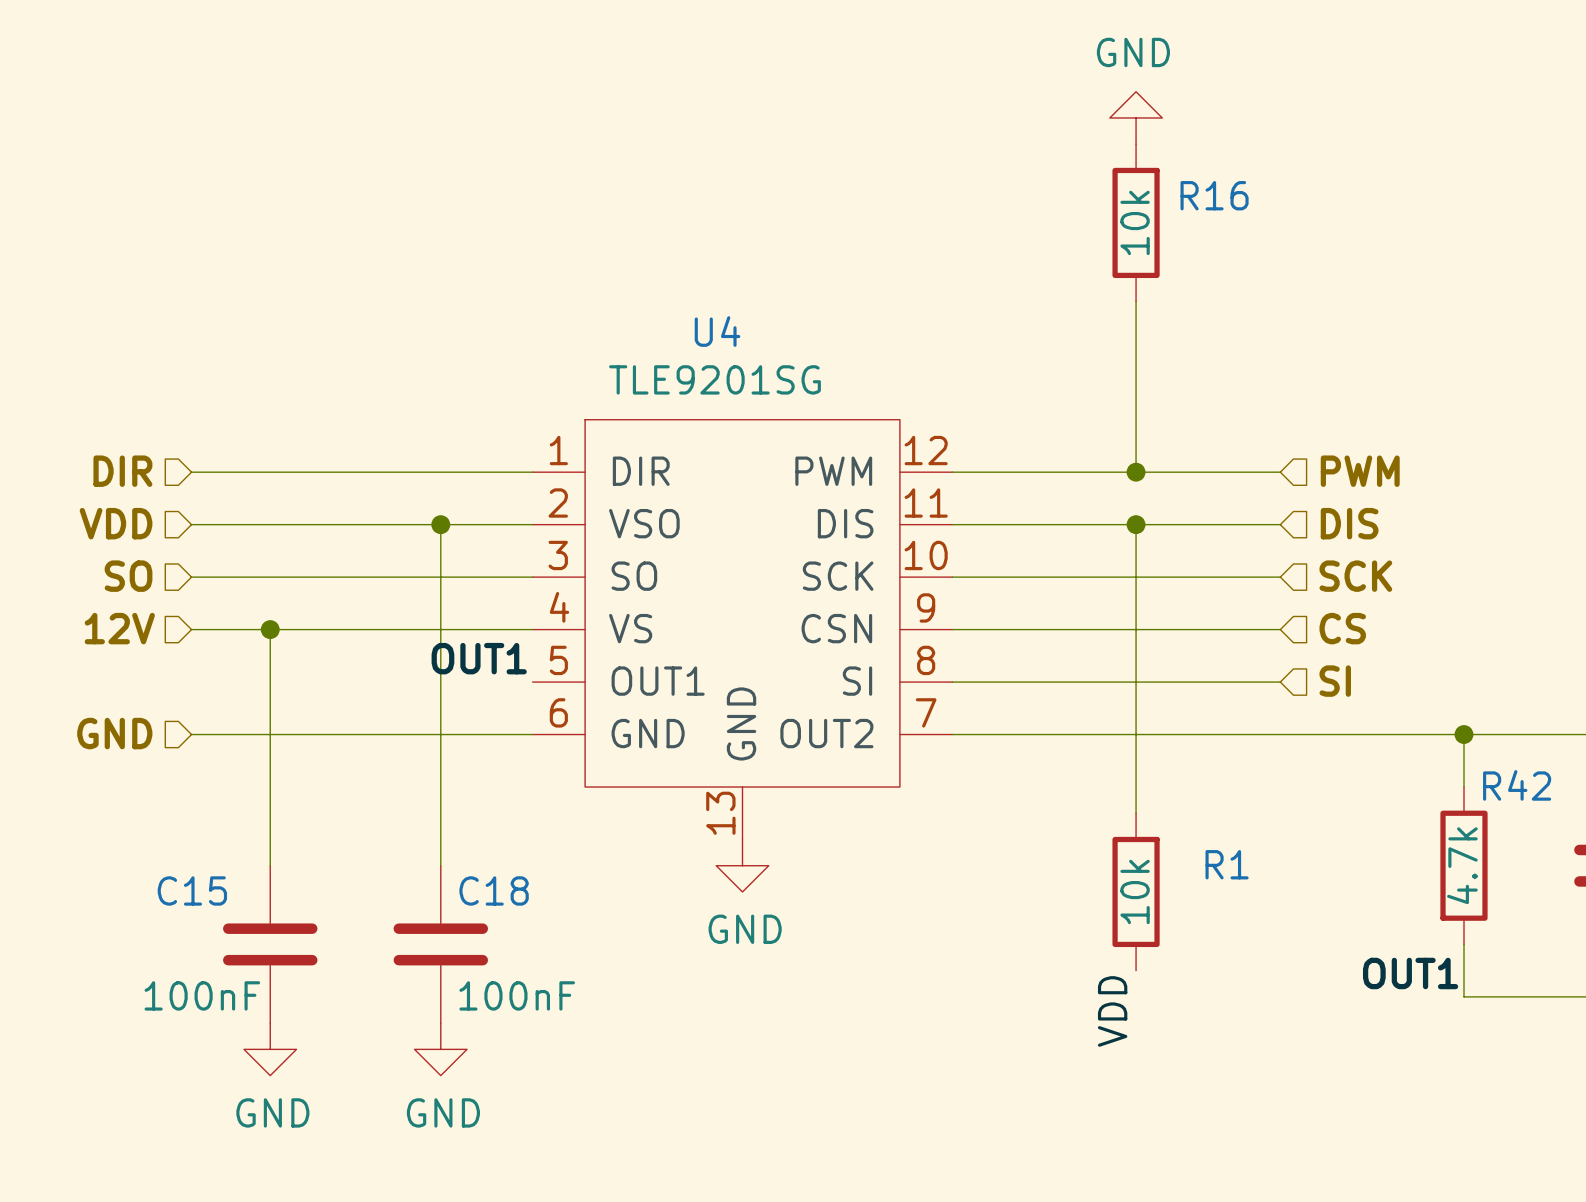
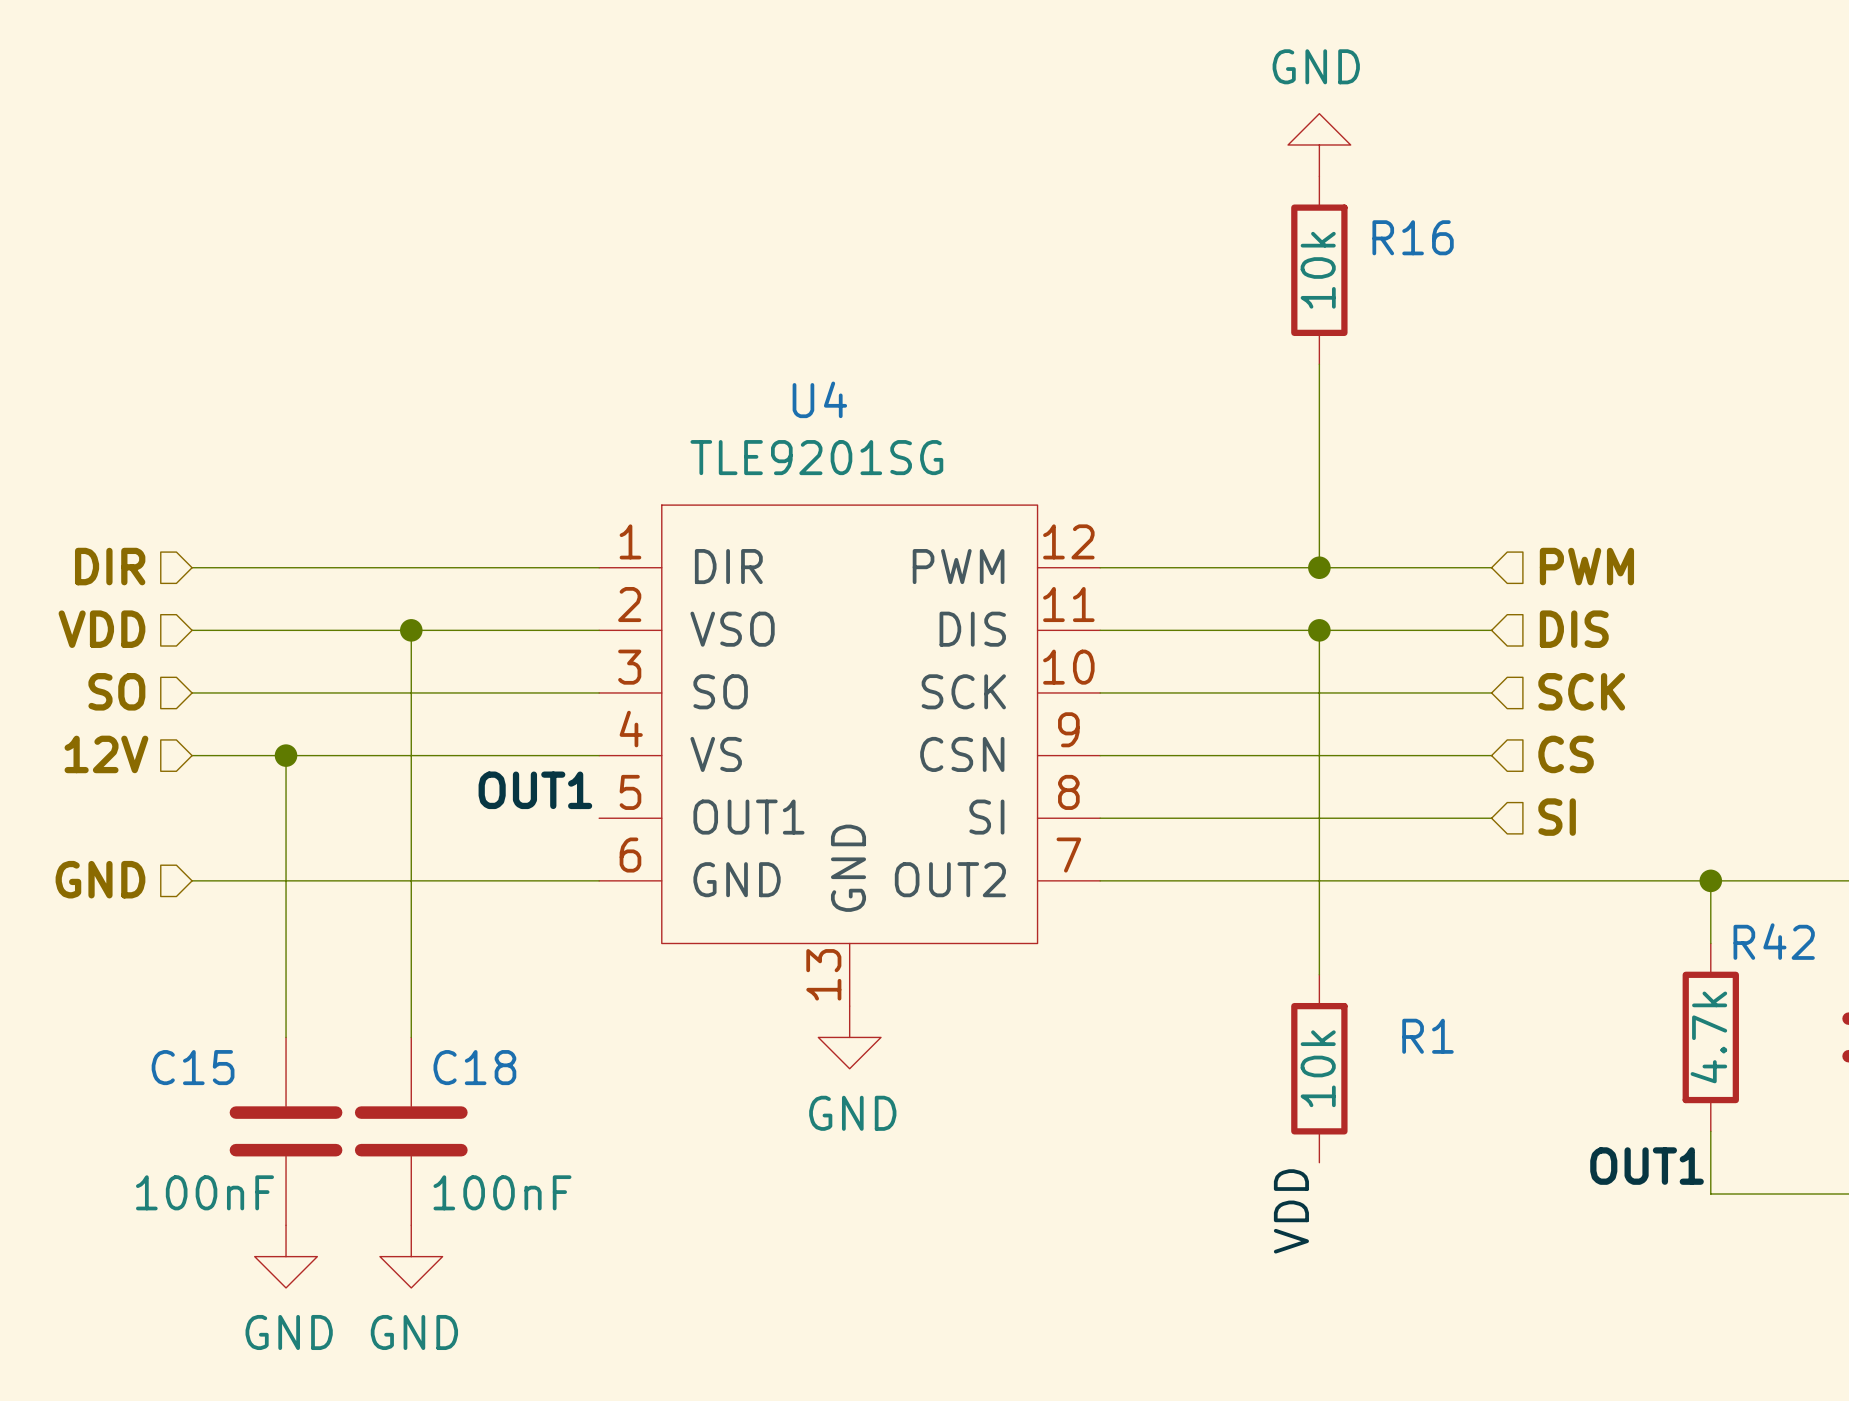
wire: (440, 524) (440, 865) -> (411, 630) (411, 1037)
junction position: (440, 524) -> (411, 630)
C18 position: (440, 944) -> (411, 1131)
power symbol position: GND (440, 1049) -> GND (411, 1256)

